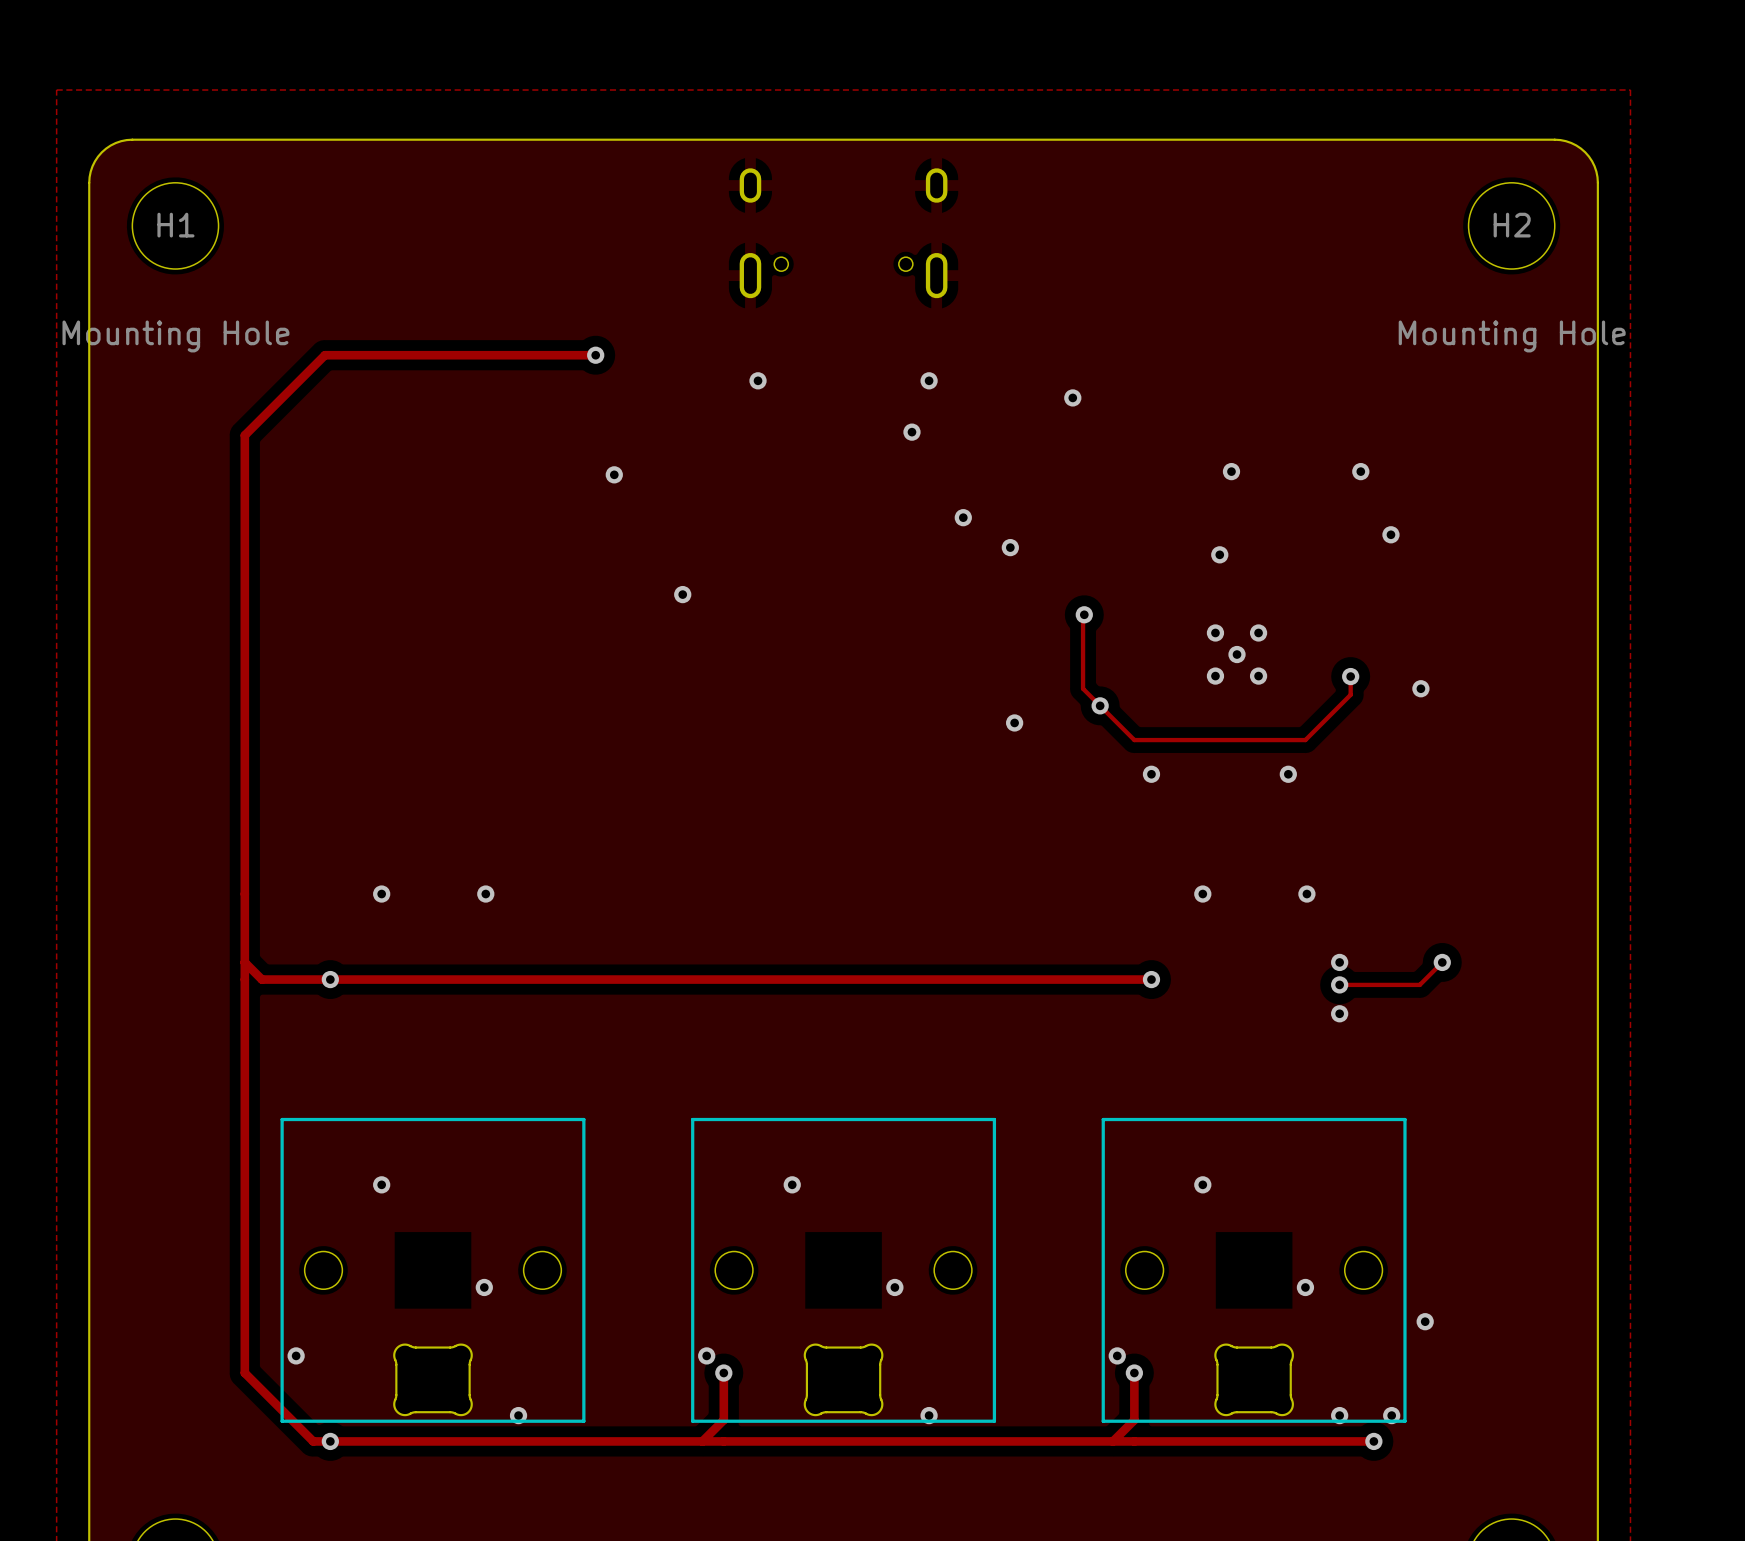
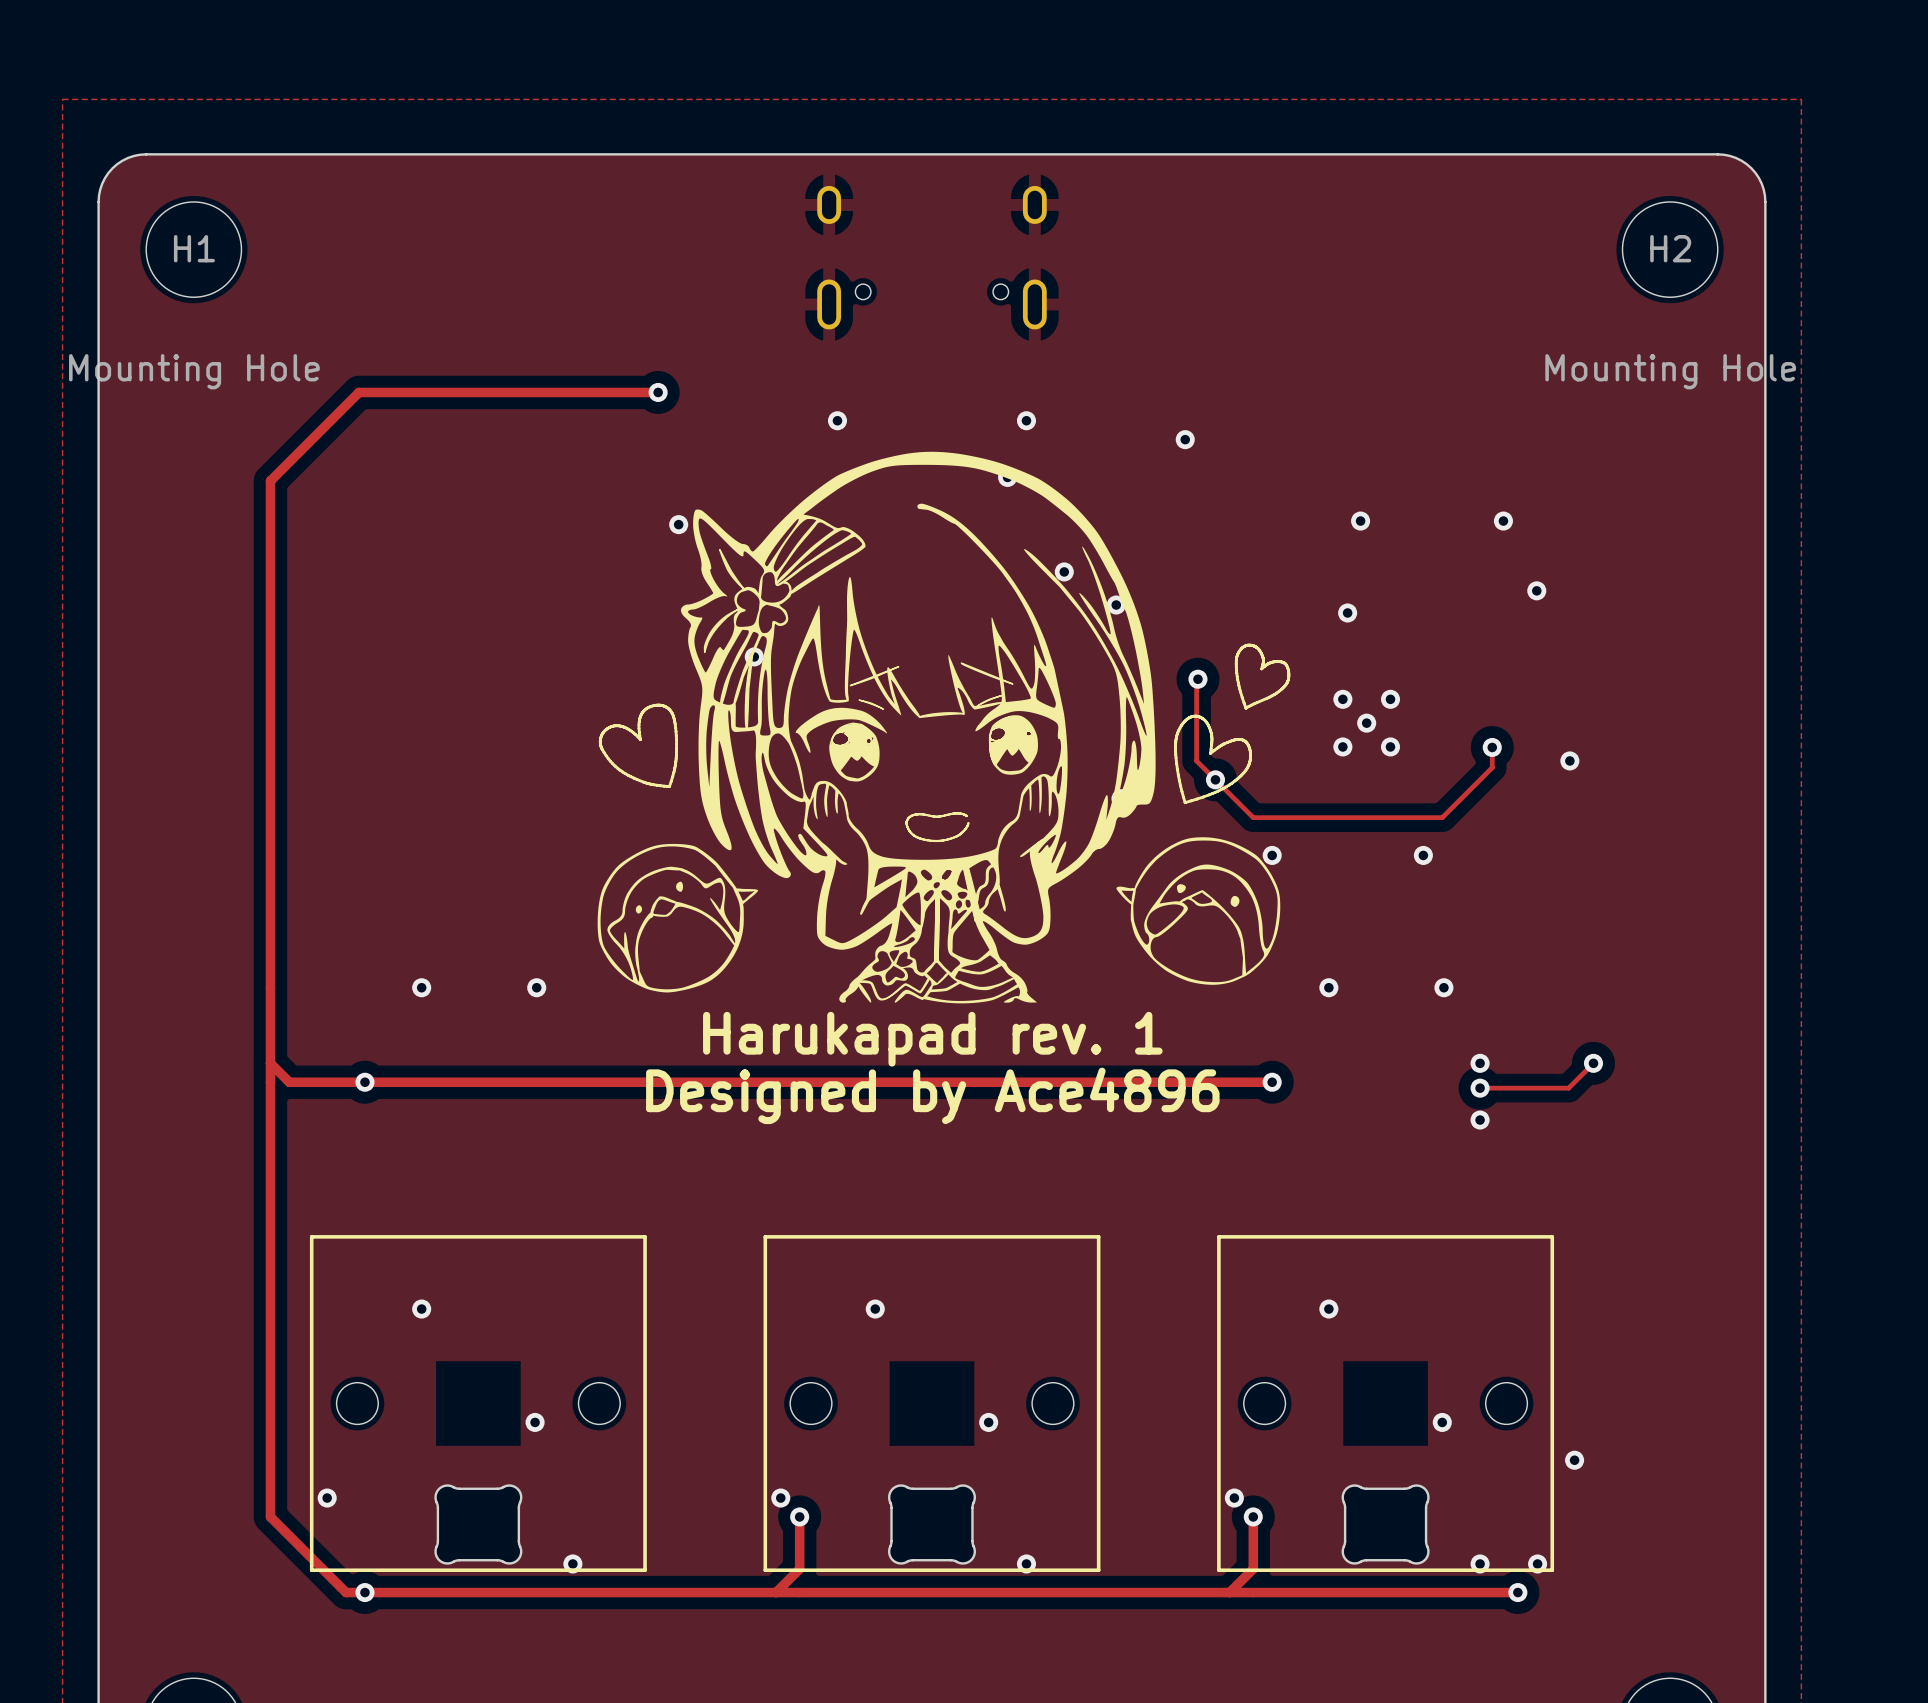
drawing: none -> [597, 451, 1281, 1004]
line: none -> (1283, 662) (1272, 662) (1261, 668) (1263, 658) (1257, 648) (1247, 645) (1240, 650) (1236, 659) (1236, 673) (1245, 708) (1272, 695) (1284, 686) (1288, 676) (1286, 664)
line: none -> (657, 705) (647, 707) (641, 715) (638, 725) (640, 739) (628, 729) (615, 725) (603, 732) (600, 744) (610, 761) (625, 773) (646, 783) (669, 786) (676, 758) (675, 723) (669, 709) (657, 705)
line: none -> (1195, 716) (1188, 717) (1182, 723) (1175, 740) (1177, 769) (1185, 802) (1212, 793) (1231, 783) (1245, 771) (1250, 759) (1248, 745) (1240, 739) (1224, 743) (1210, 753) (1211, 738) (1209, 728) (1203, 719) (1195, 716)
line: none -> (1002, 728) (994, 728)
line: none -> (870, 738) (871, 739)
line: none -> (847, 742) (841, 745)
line: none -> (836, 745) (838, 745)
line: none -> (965, 815) (957, 813) (937, 816) (921, 814) (911, 815)
line: none -> (968, 822) (964, 829) (957, 835) (935, 841) (914, 836) (909, 830) (906, 823)
text: none -> Harukapad rev. 1 (932, 1039)
text: none -> Designed by Ace4896 (932, 1095)

